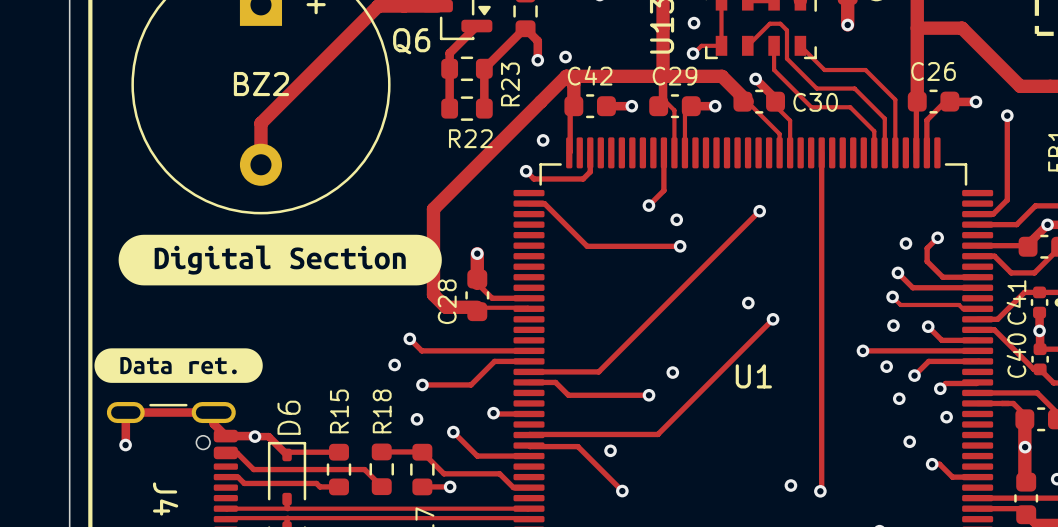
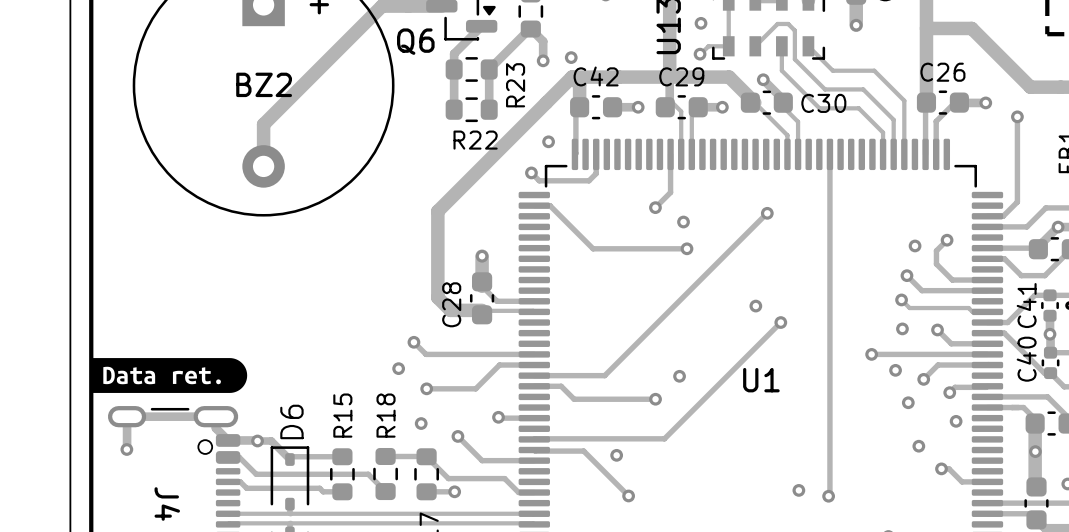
drawing: [118, 234, 442, 286] -> none
drawing shape: [94, 348, 263, 383] -> [90, 358, 248, 393]

